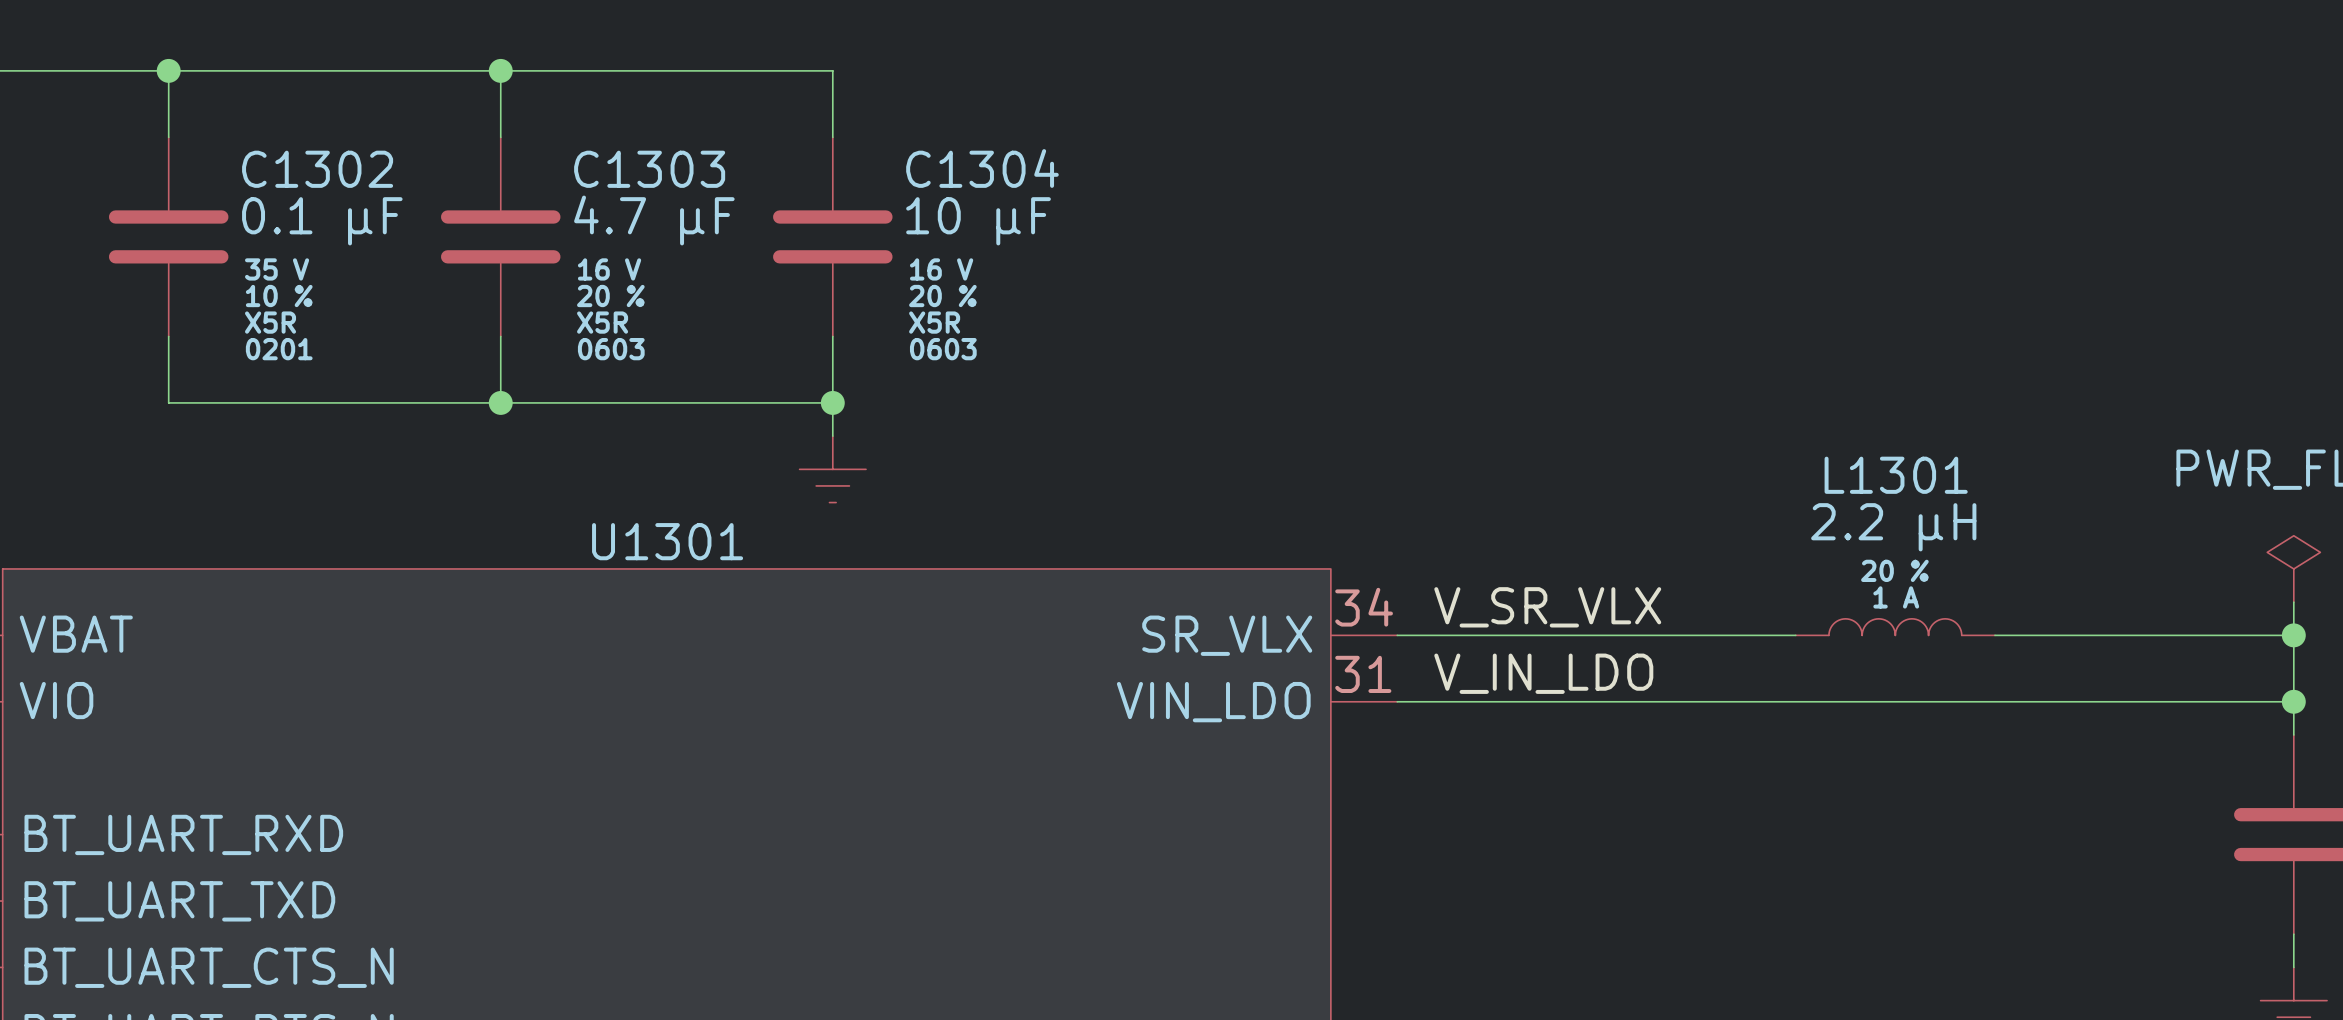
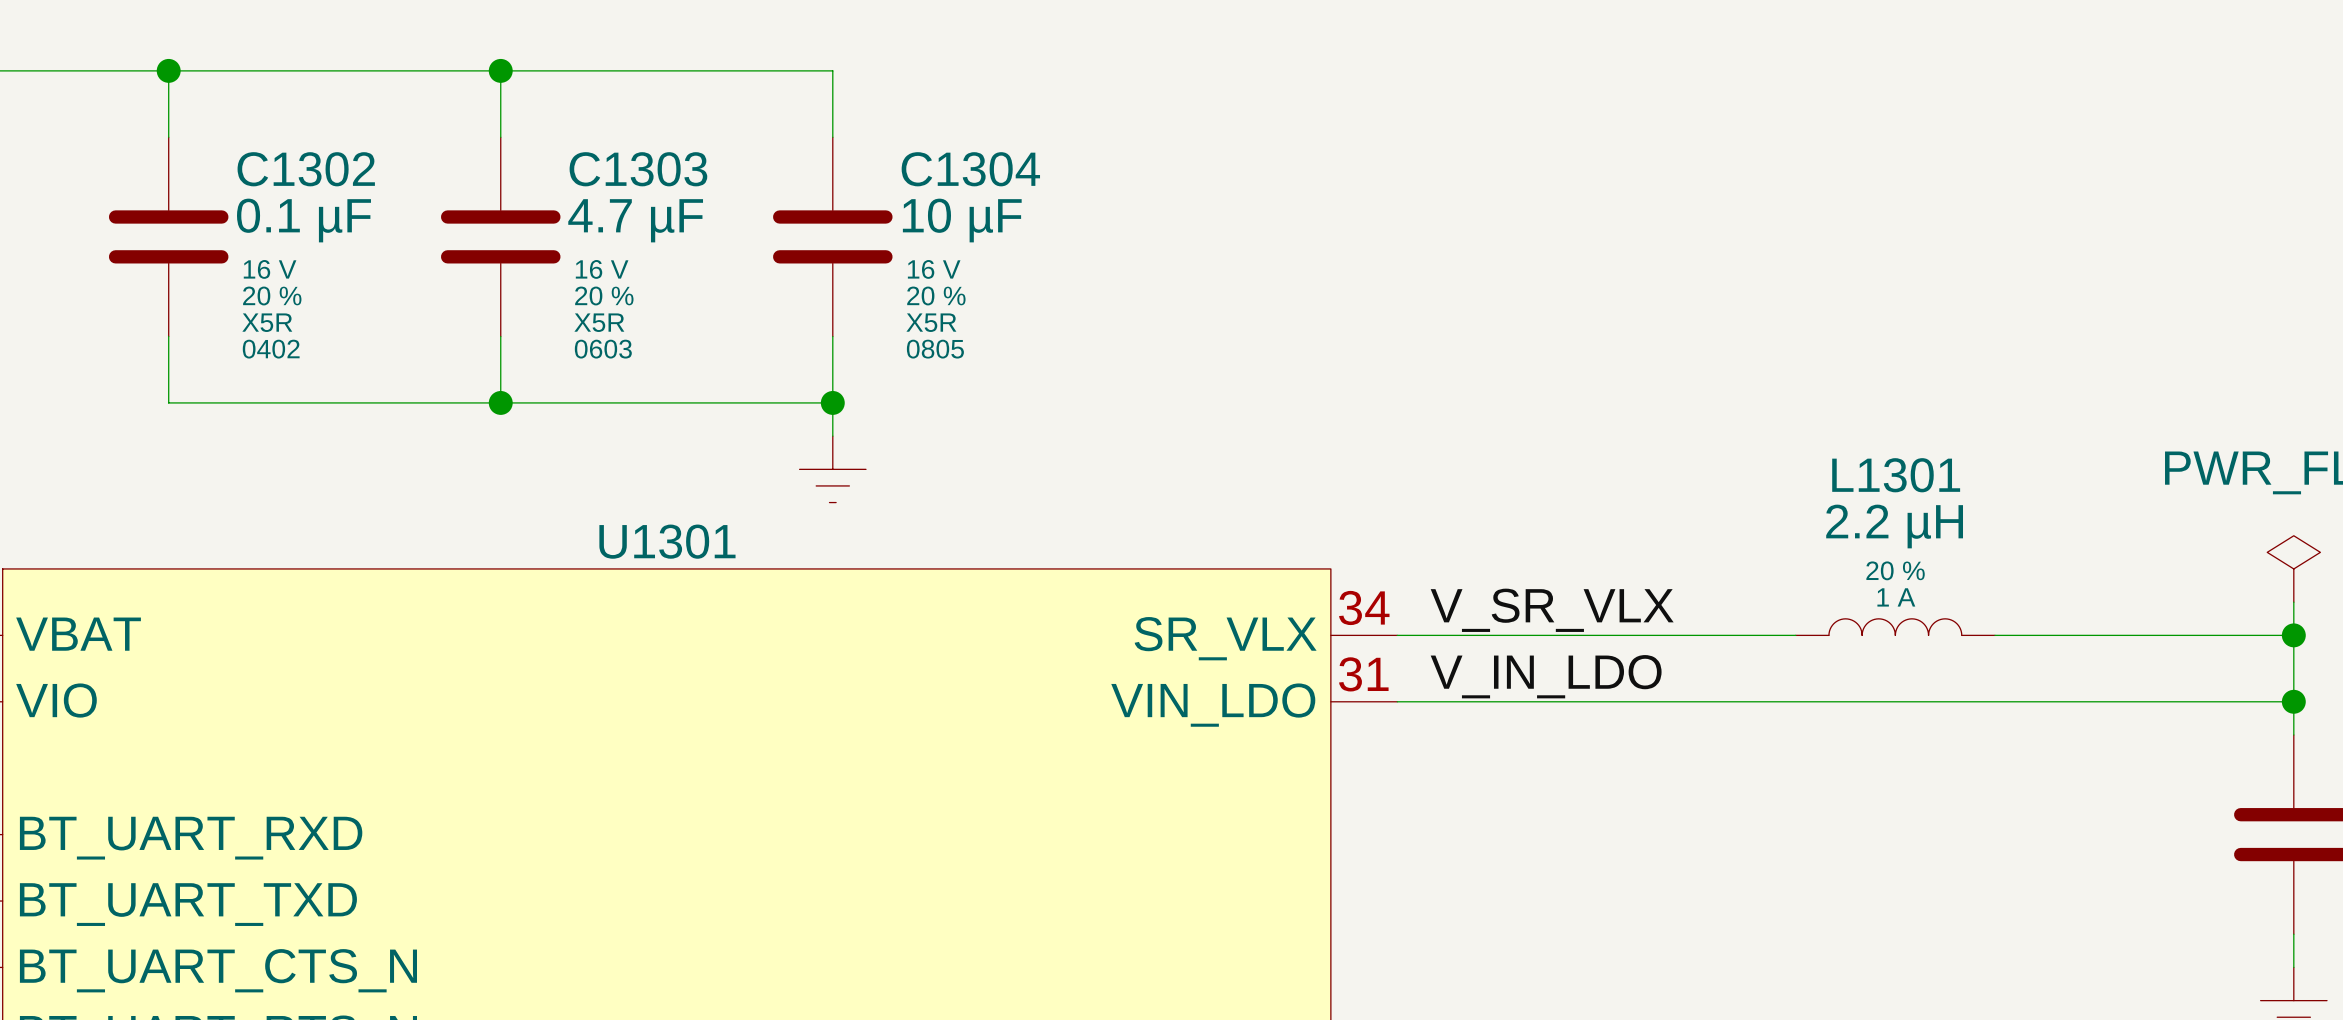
C1302 text: 35 V (277, 269) -> 16 V (270, 269)
C1302 text: 10 % (279, 296) -> 20 % (272, 296)
C1302 text: 0201 (279, 349) -> 0402 (271, 349)
C1304 text: 0603 (943, 349) -> 0805 (935, 349)

